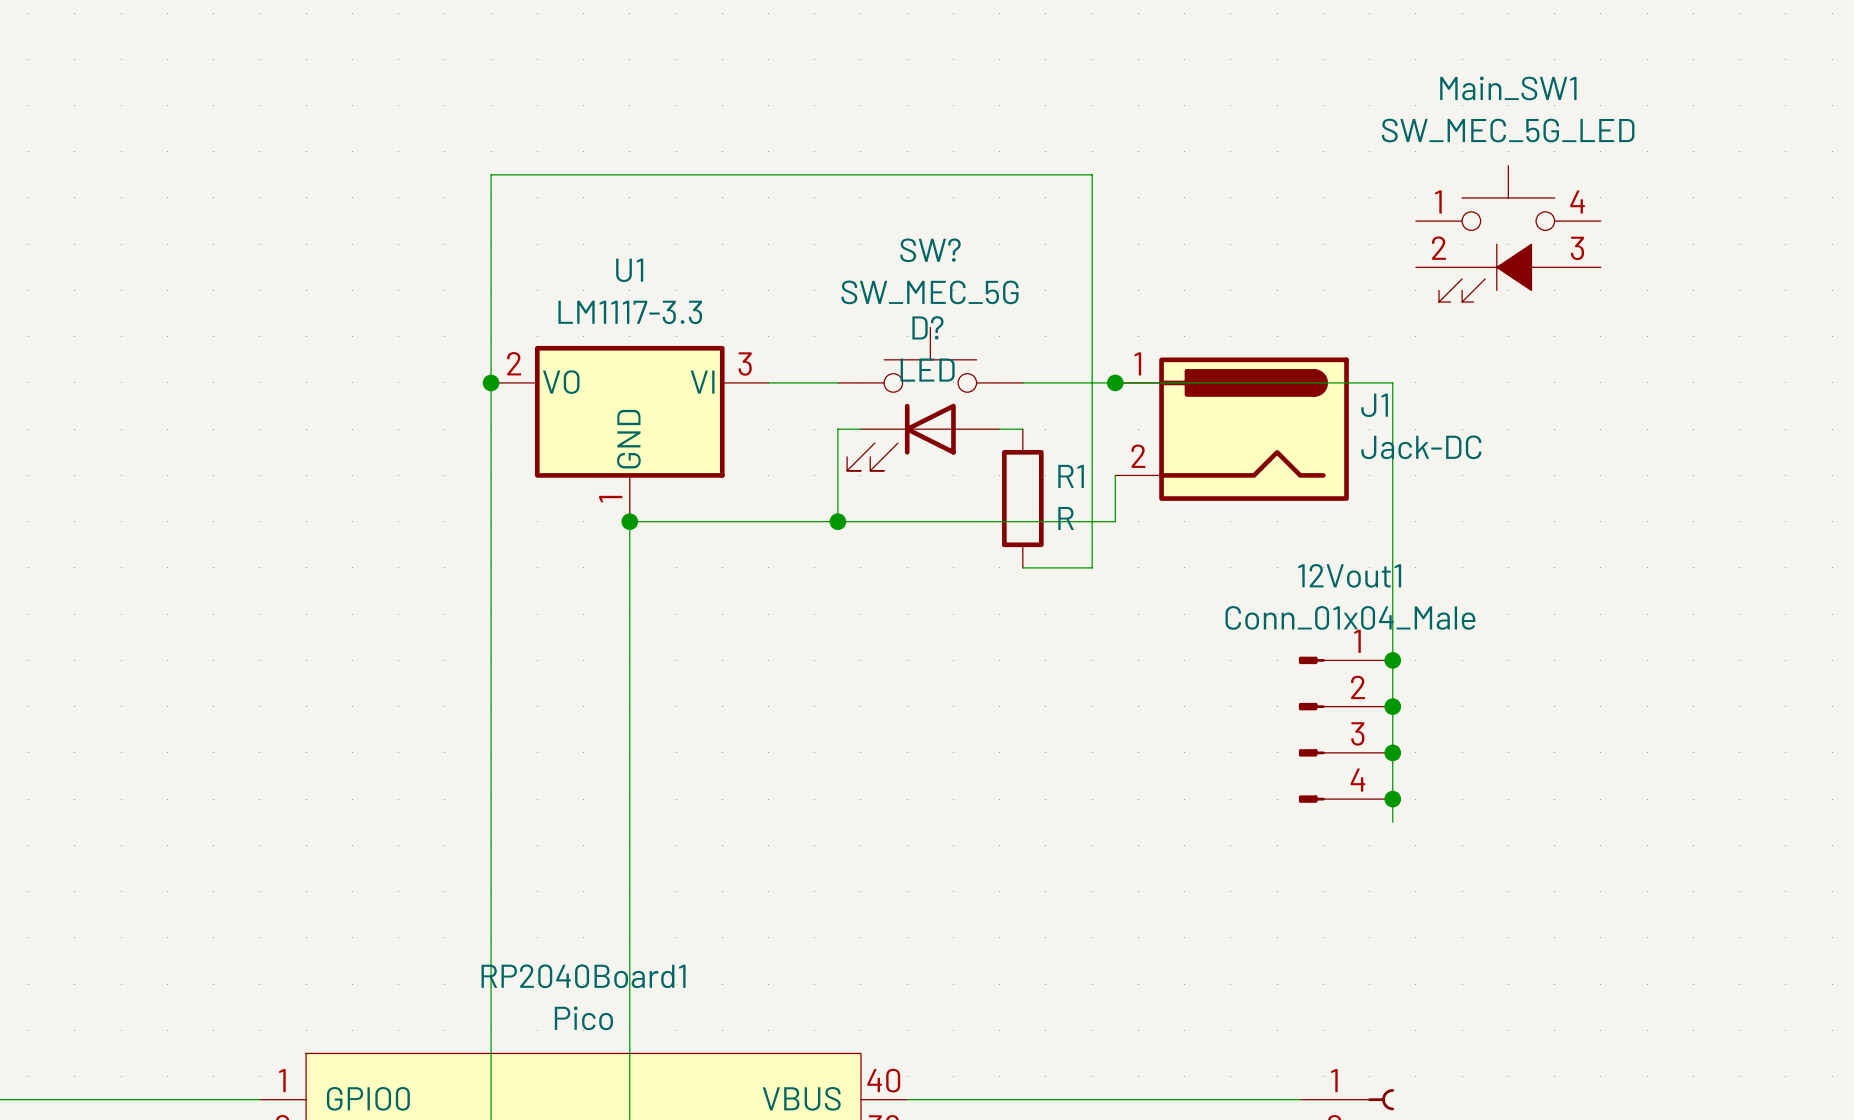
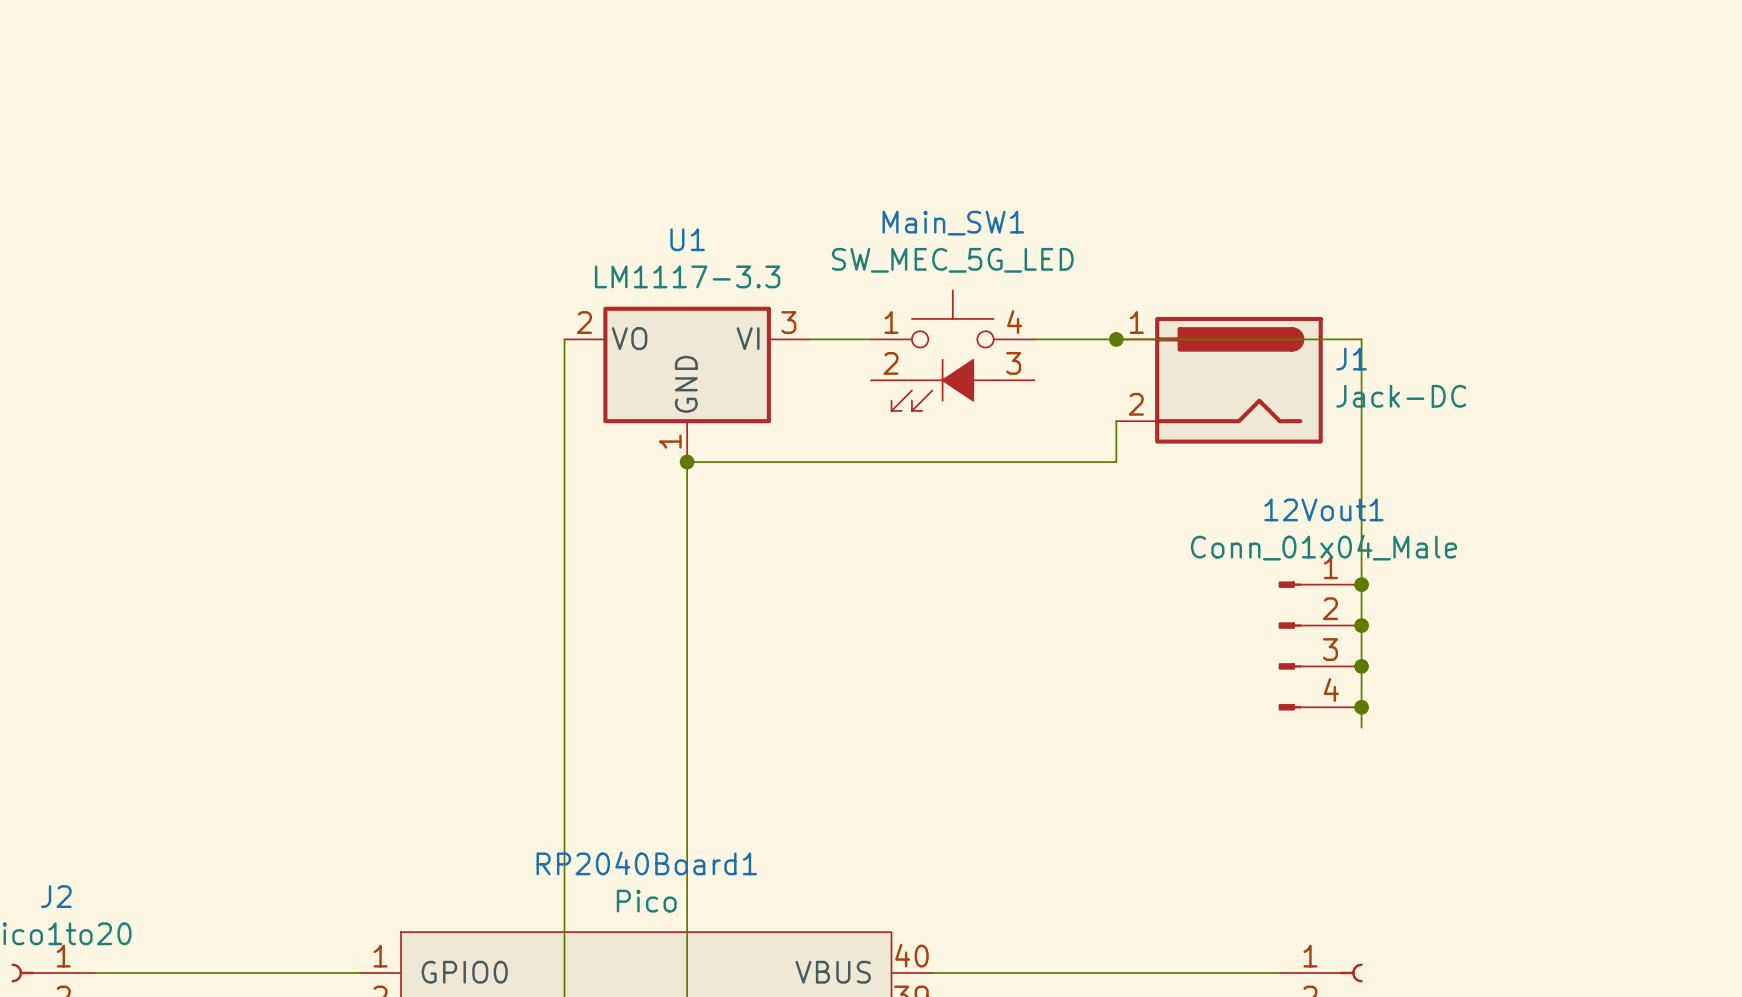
Main_SW1 position: (1508, 233) -> (952, 350)
SW?: SW_MEC_5G (930, 359) -> none
wire: (491, 382) (491, 174) (1092, 174) (1092, 567) (1022, 567) -> none
junction: (491, 382) -> none
wire: (860, 429) (837, 429) (837, 521) -> none
D?: LED (923, 437) -> none
R1: R (1022, 498) -> none
junction: (837, 521) -> none

